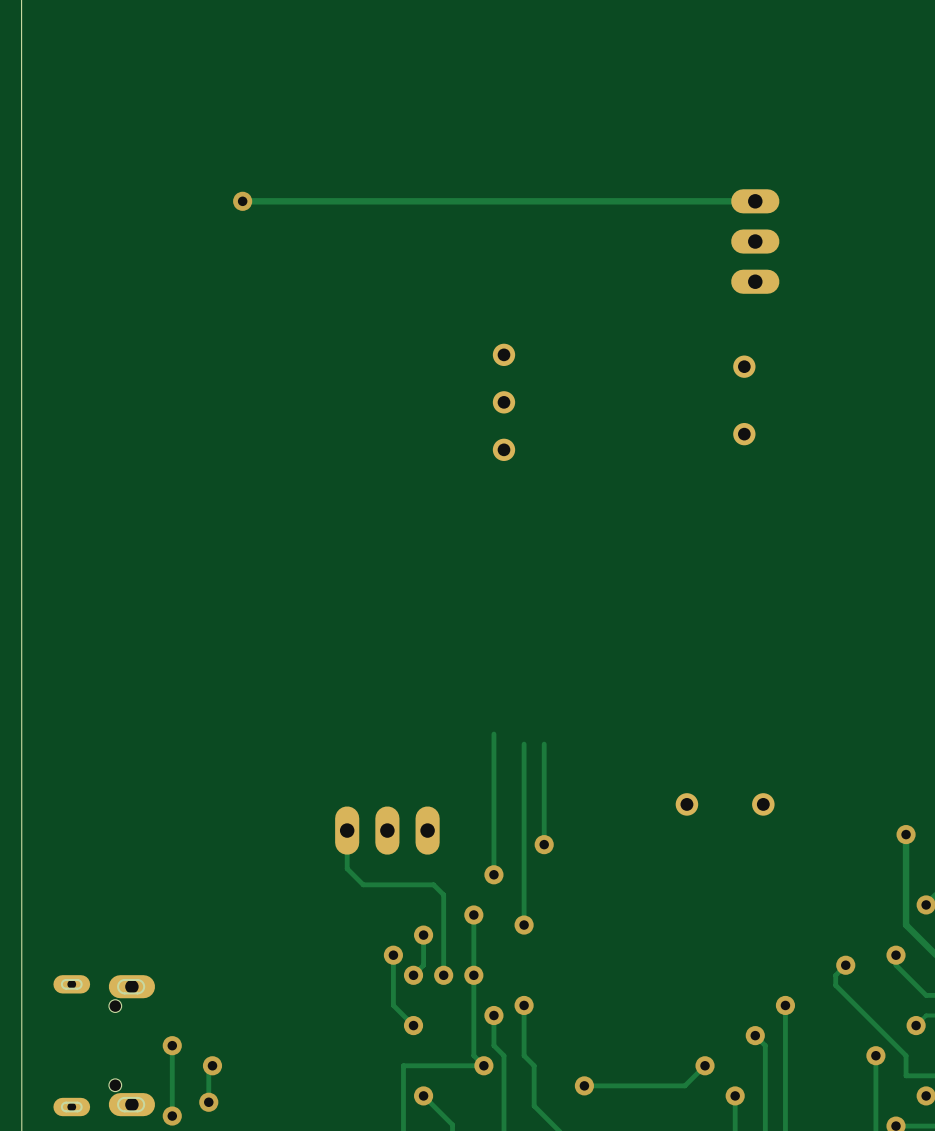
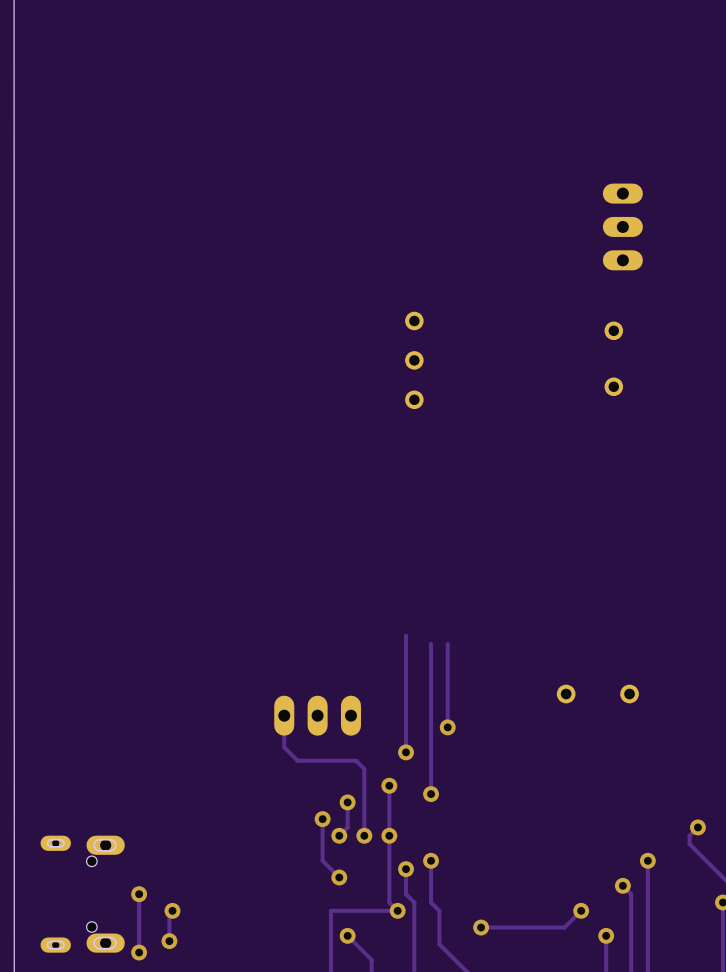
via: (242, 201) -> none
track: (755, 201) (242, 201) -> none

